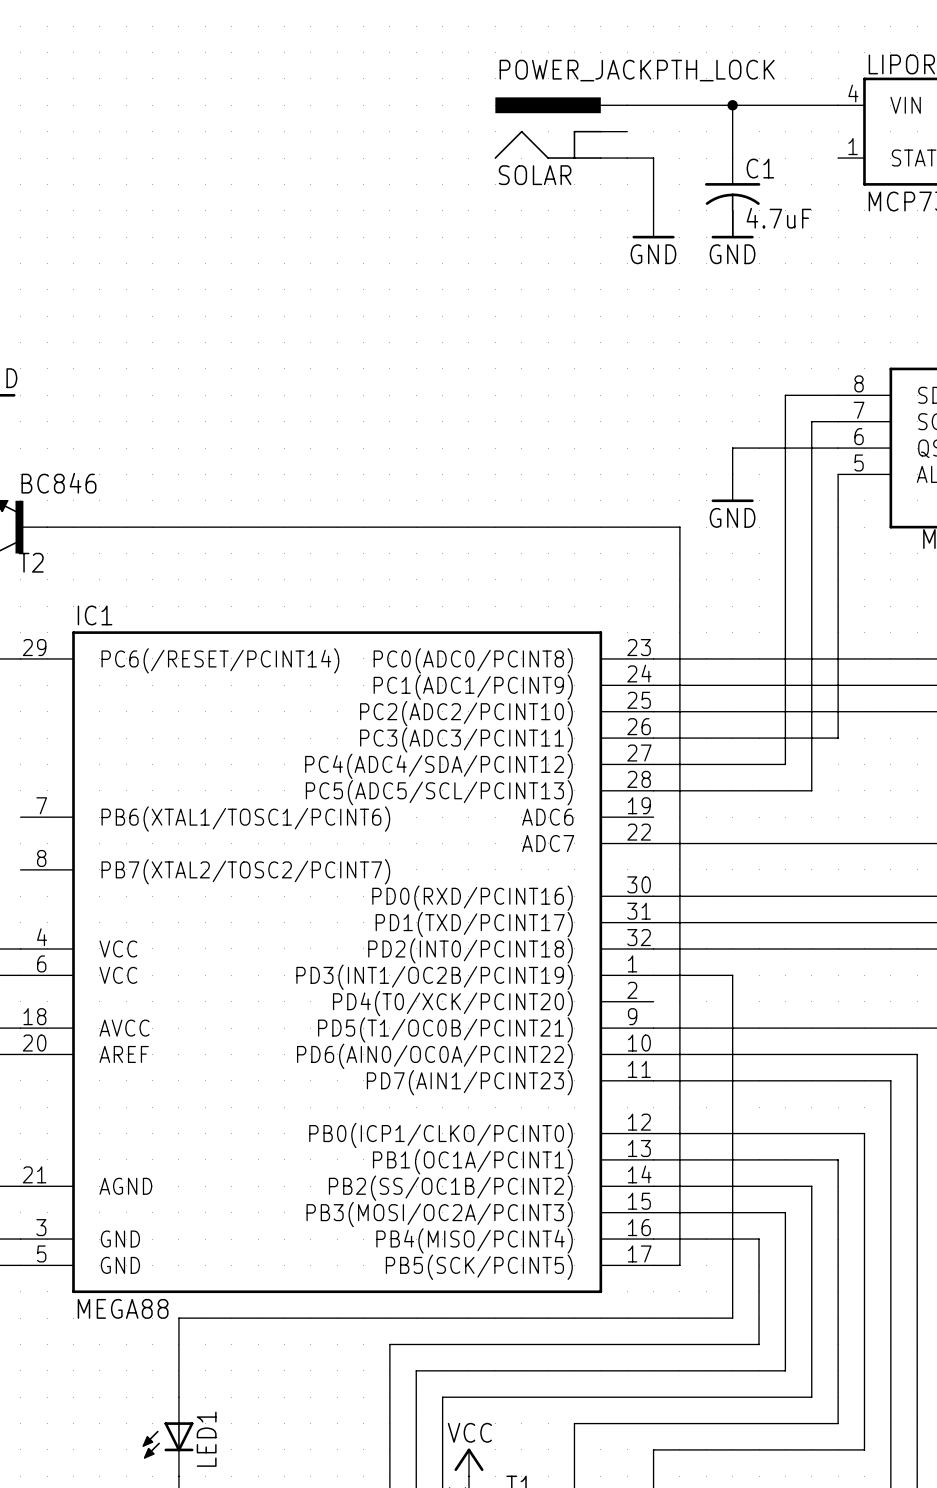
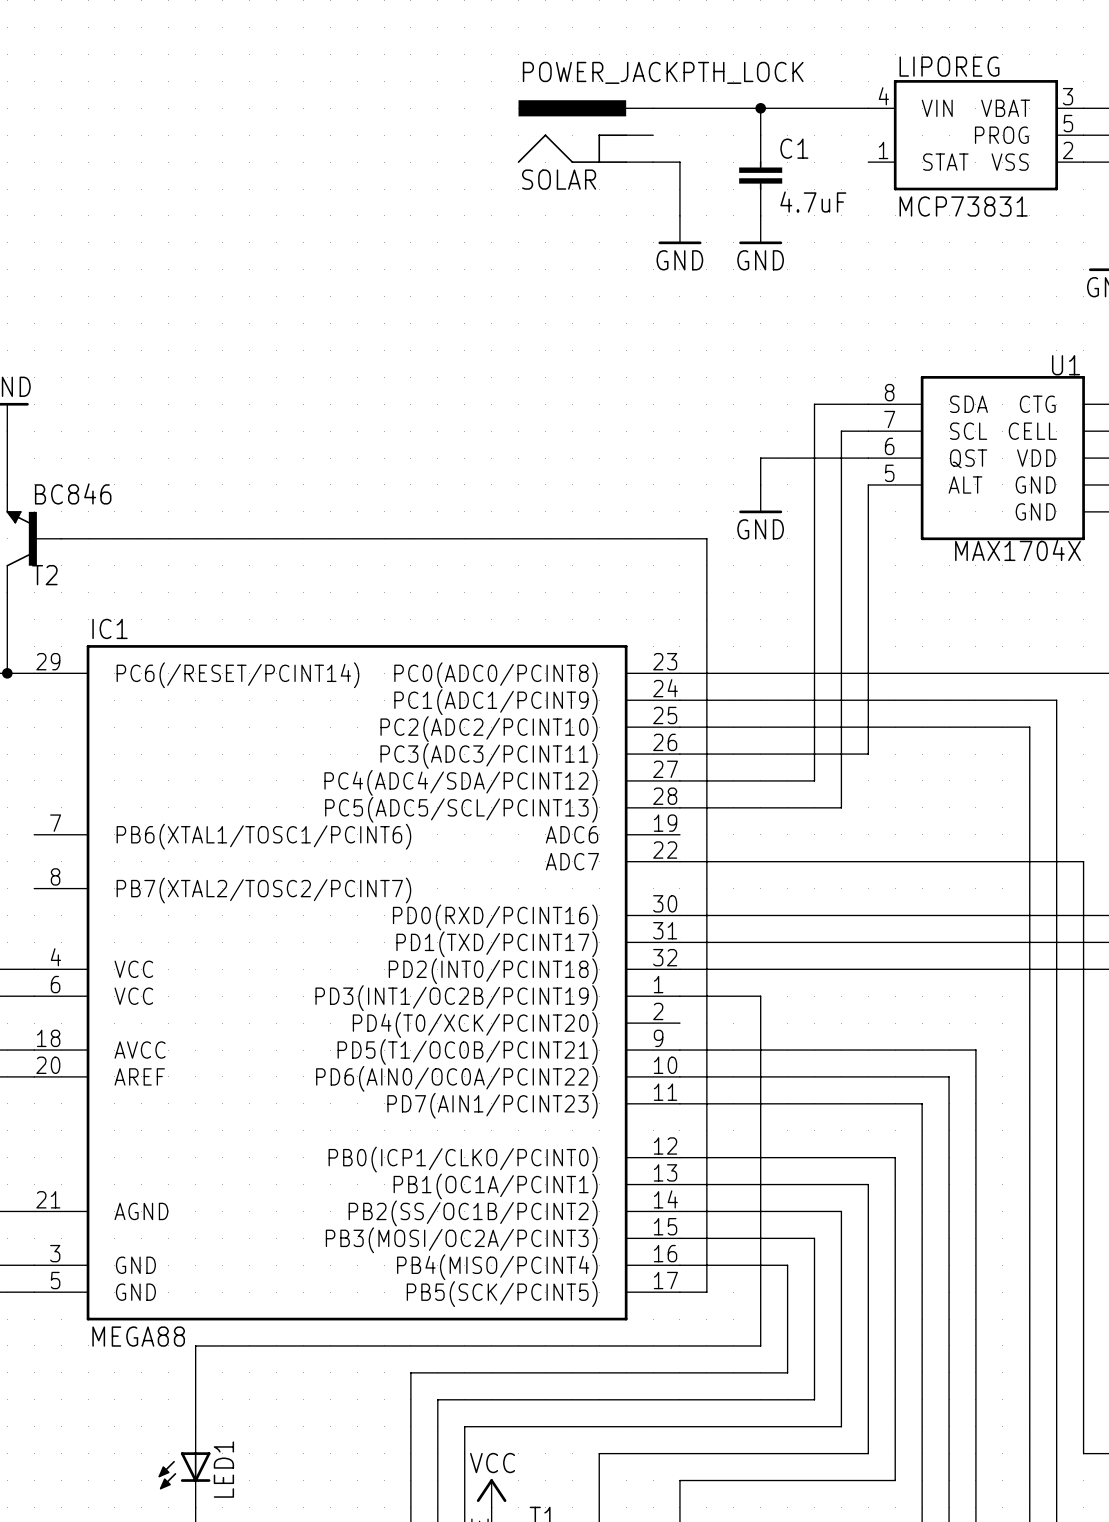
C1 symbol: [704, 158, 761, 238] -> [739, 135, 783, 216]

